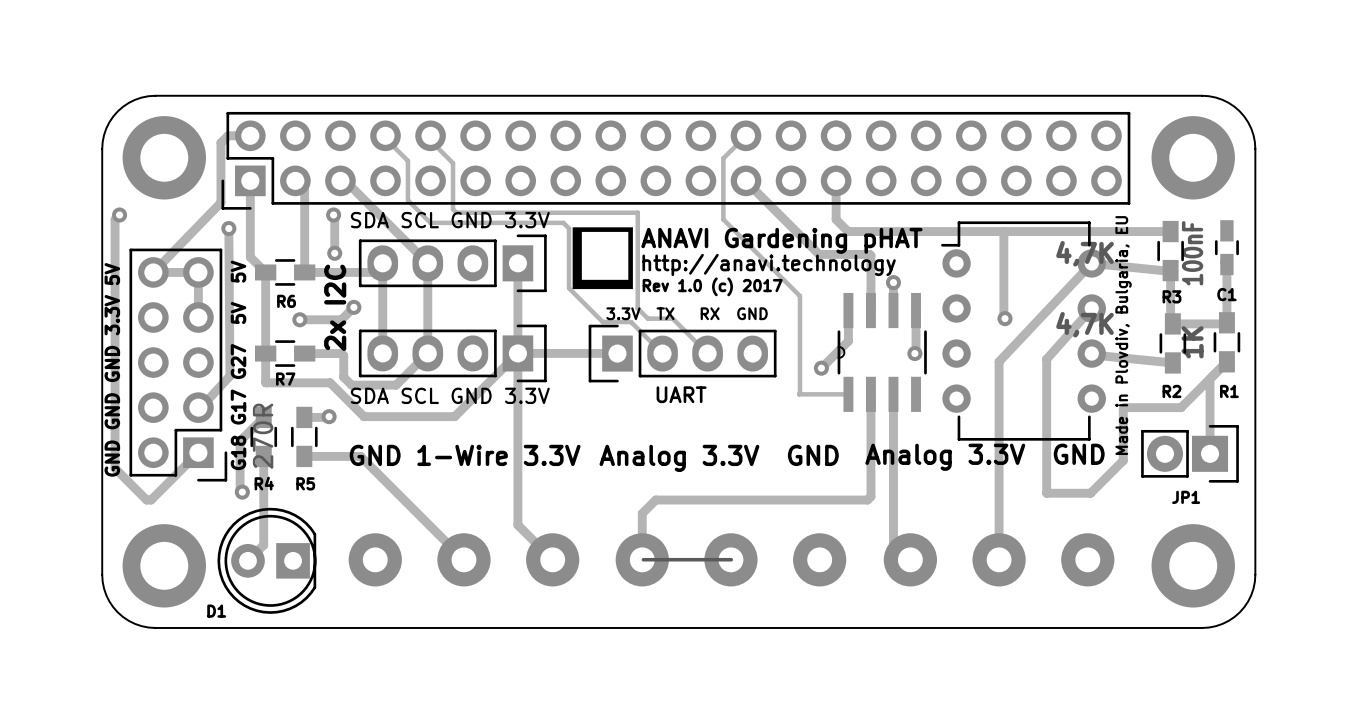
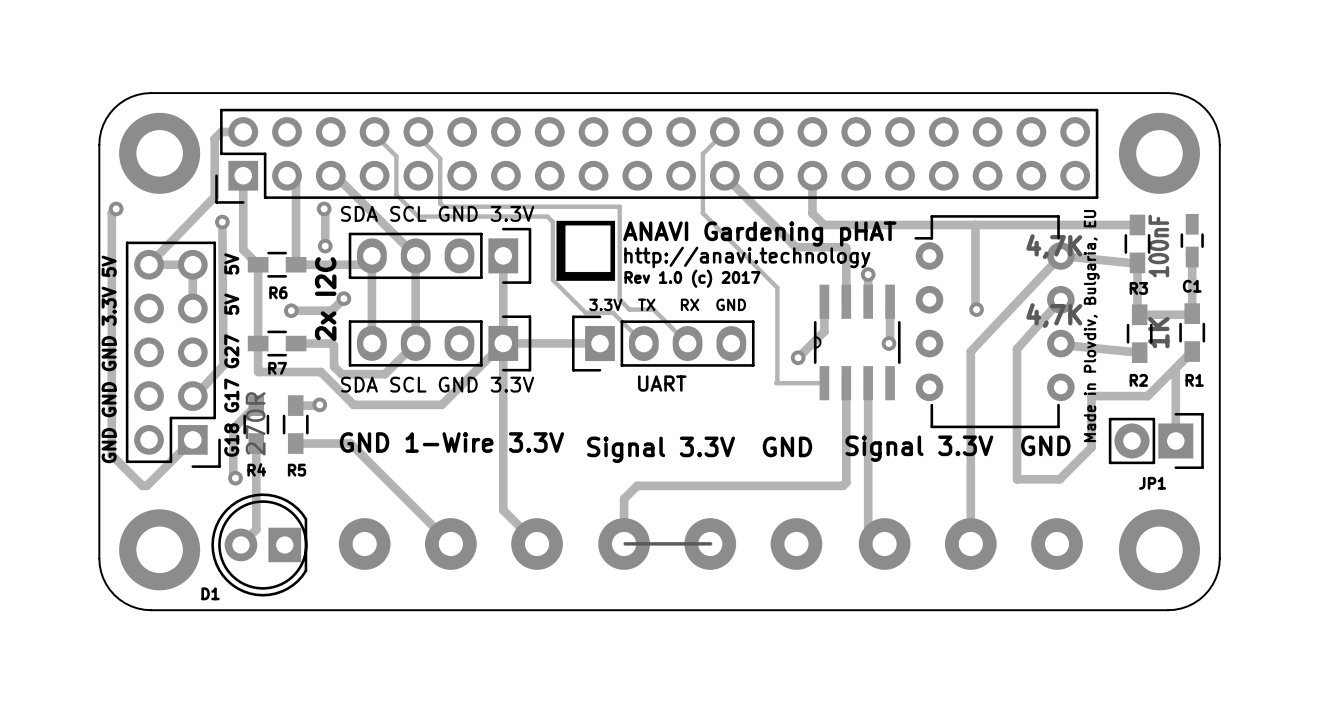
text: Analog 3.3V GND (985, 457) -> Signal 3.3V GND (957, 448)
text: Analog 3.3V GND (719, 458) -> Signal 3.3V GND (699, 449)

